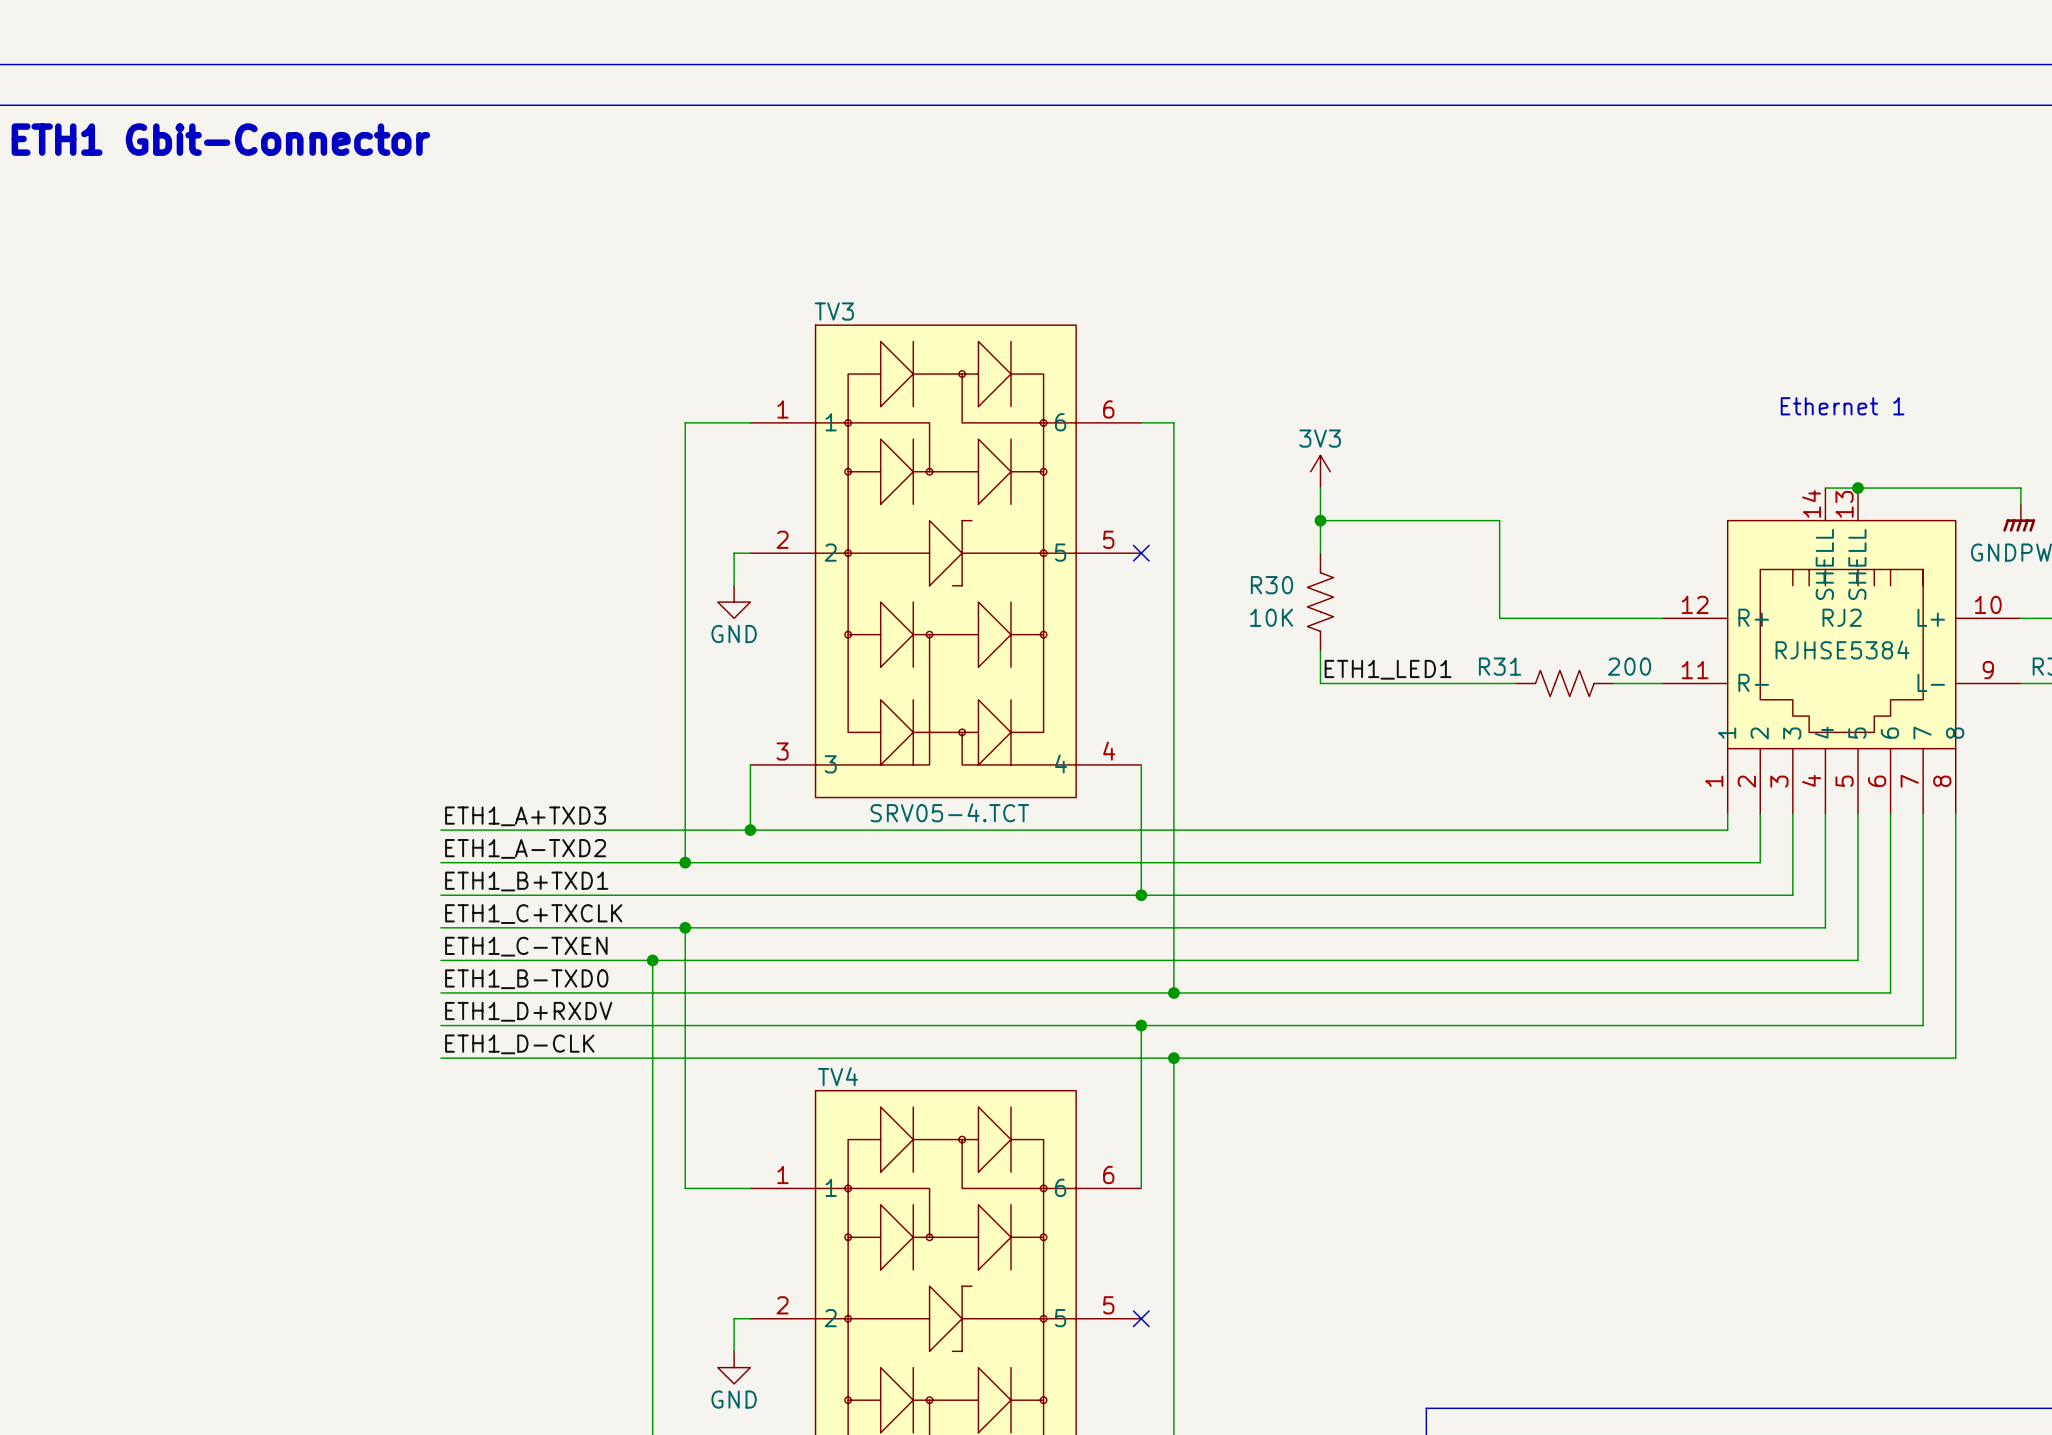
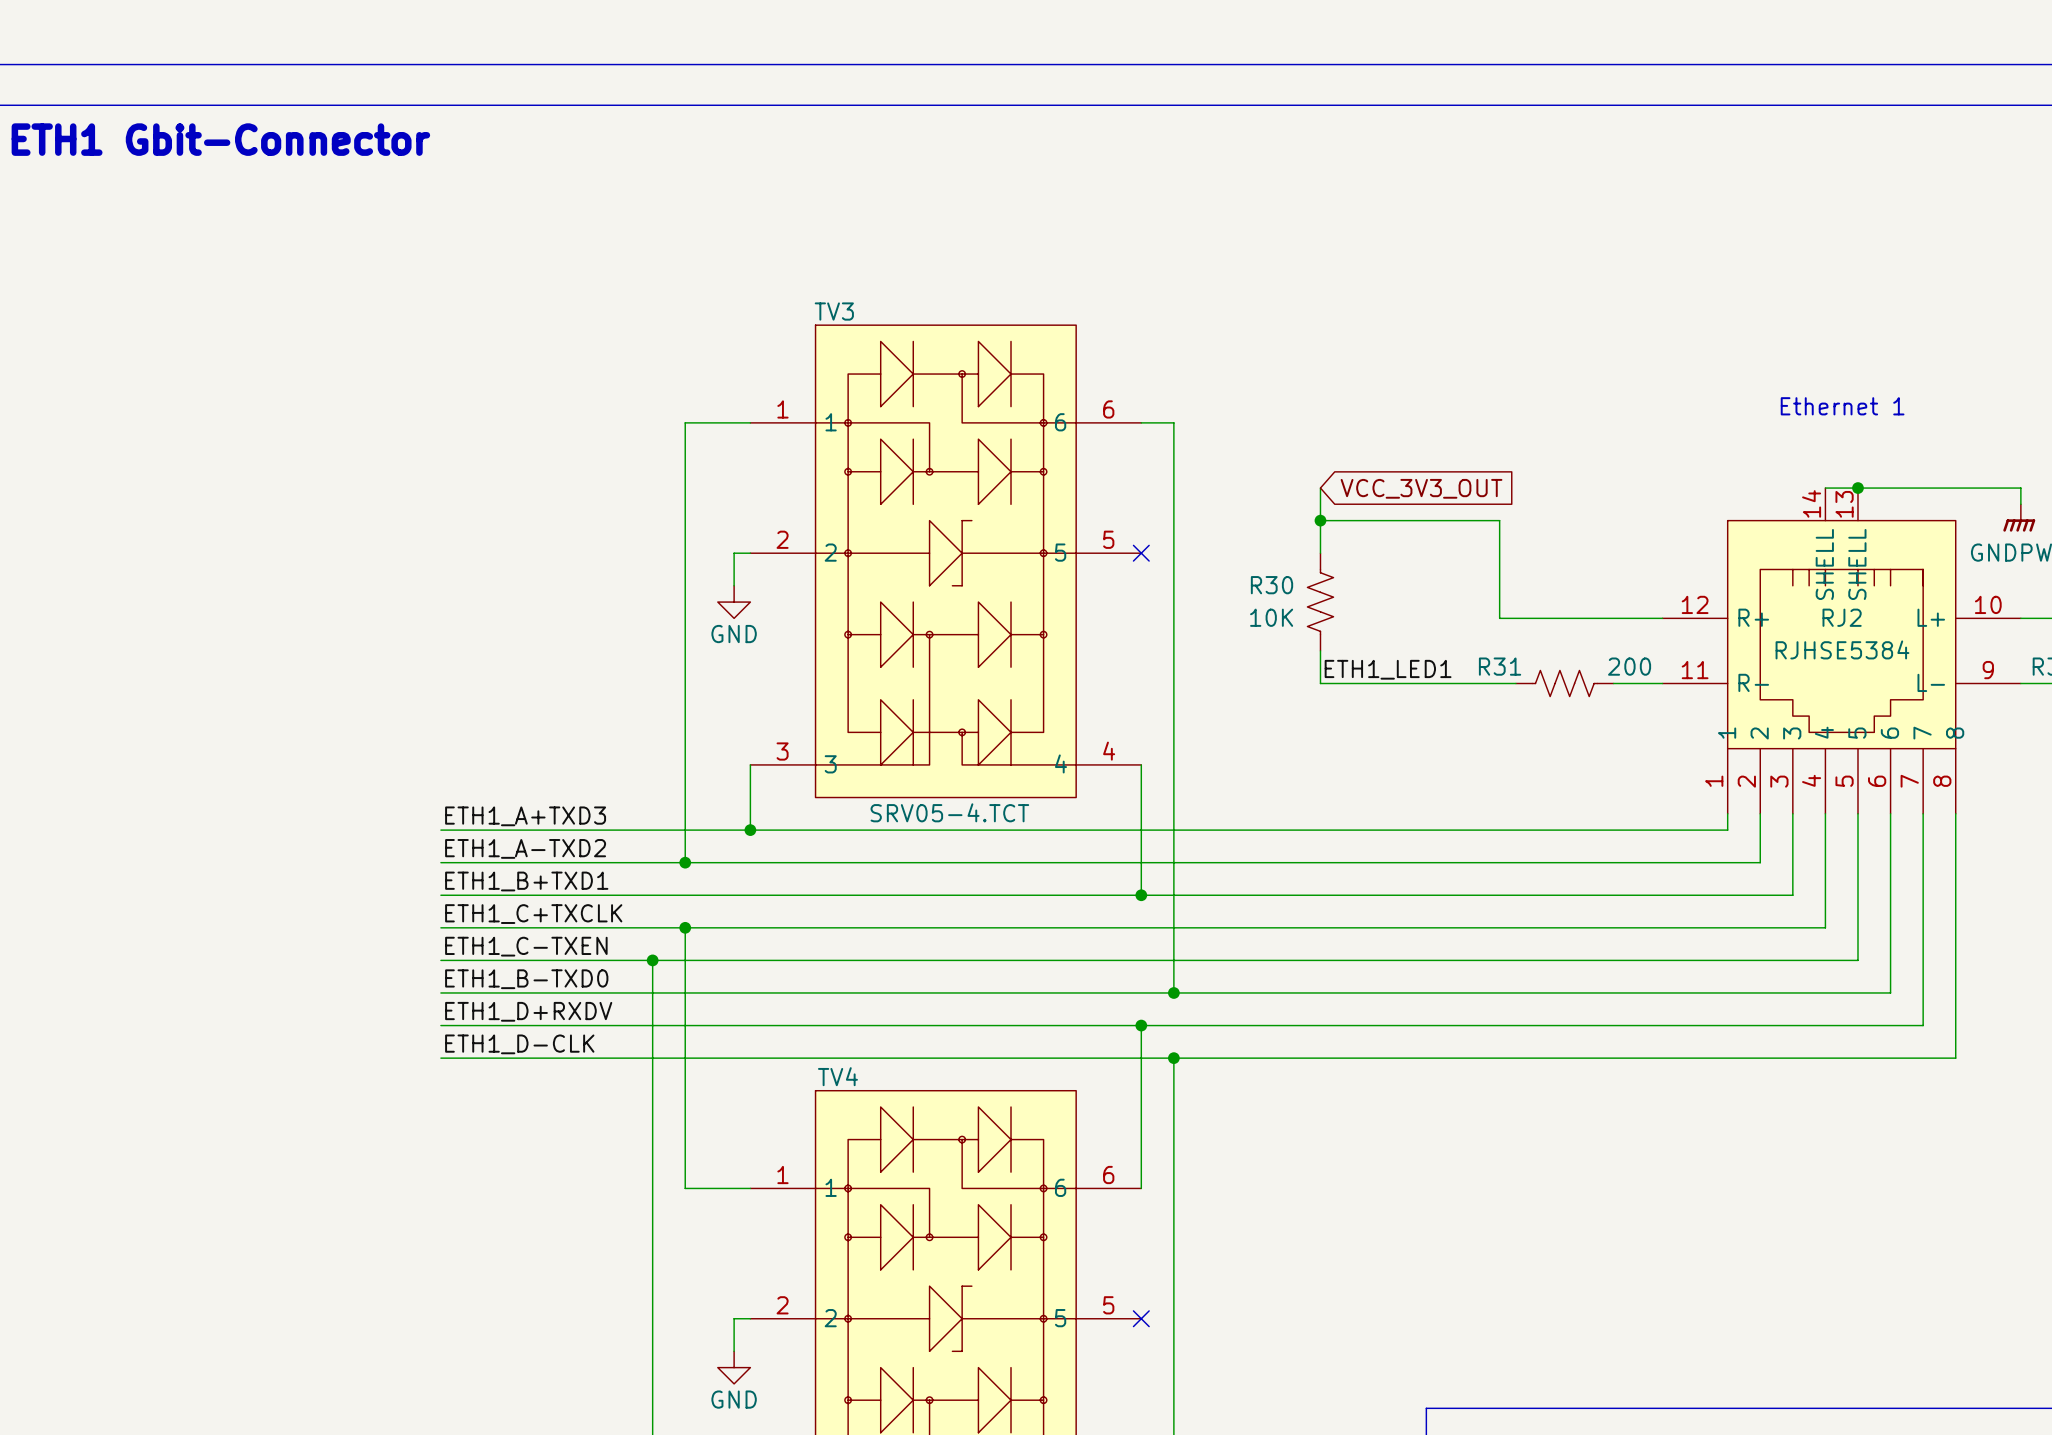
power symbol: 3V3 (1320, 471) -> none
global label: none -> VCC_3V3_OUT (1421, 488)

